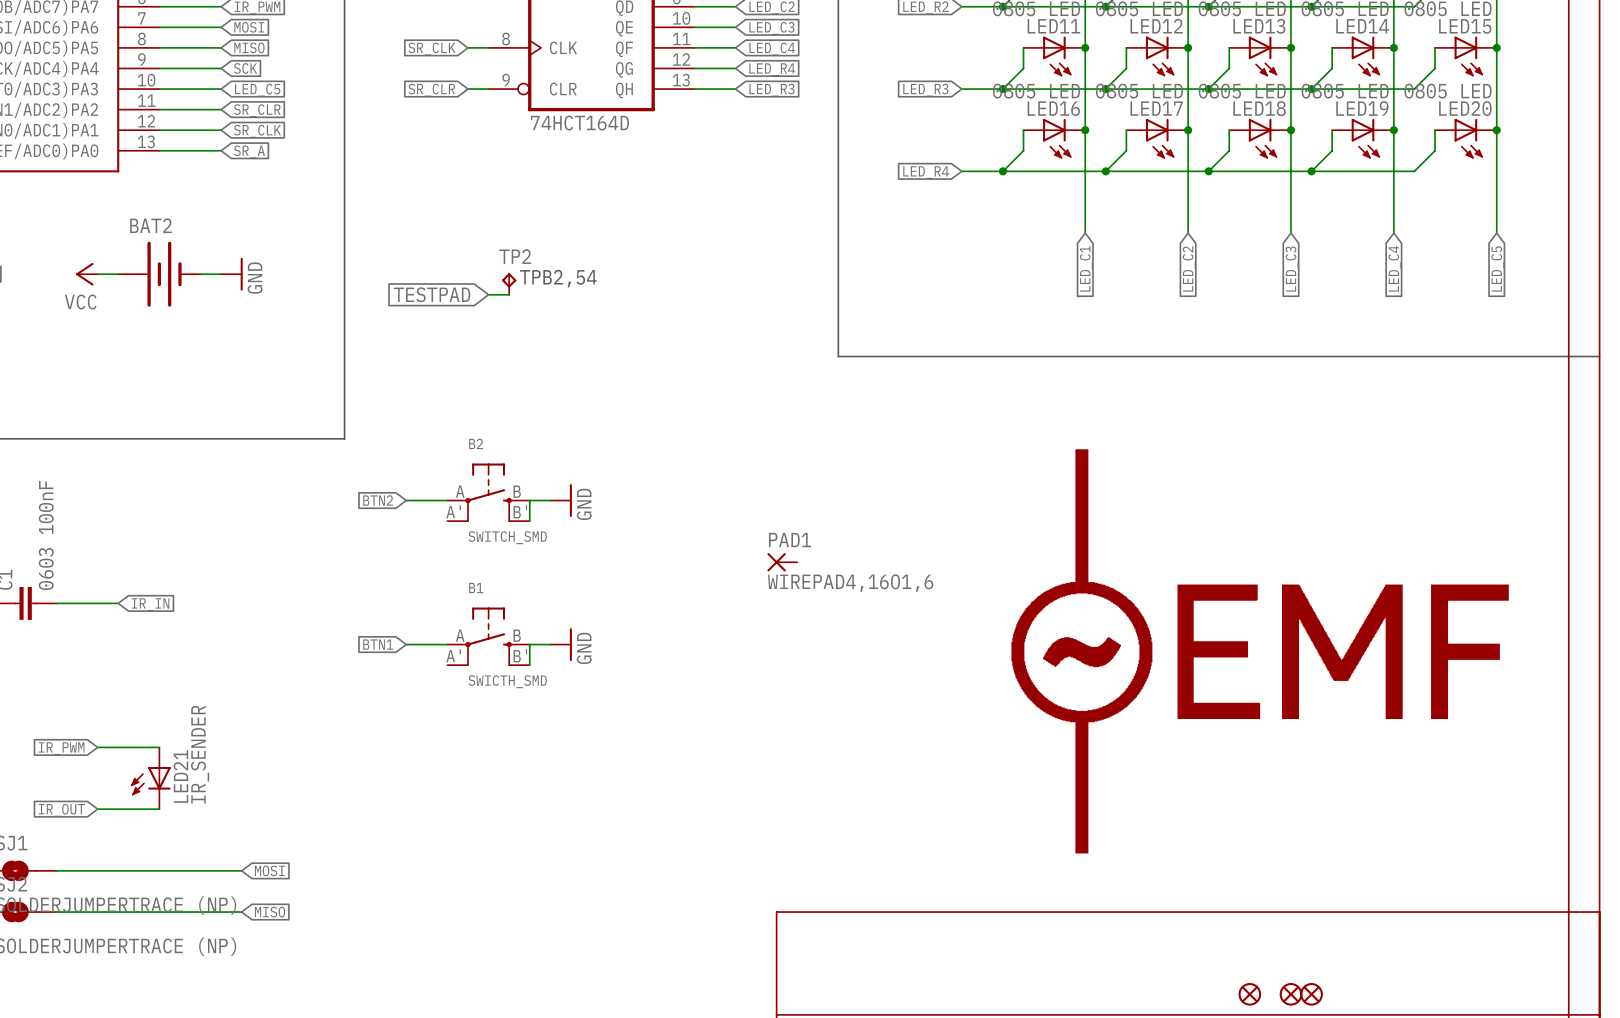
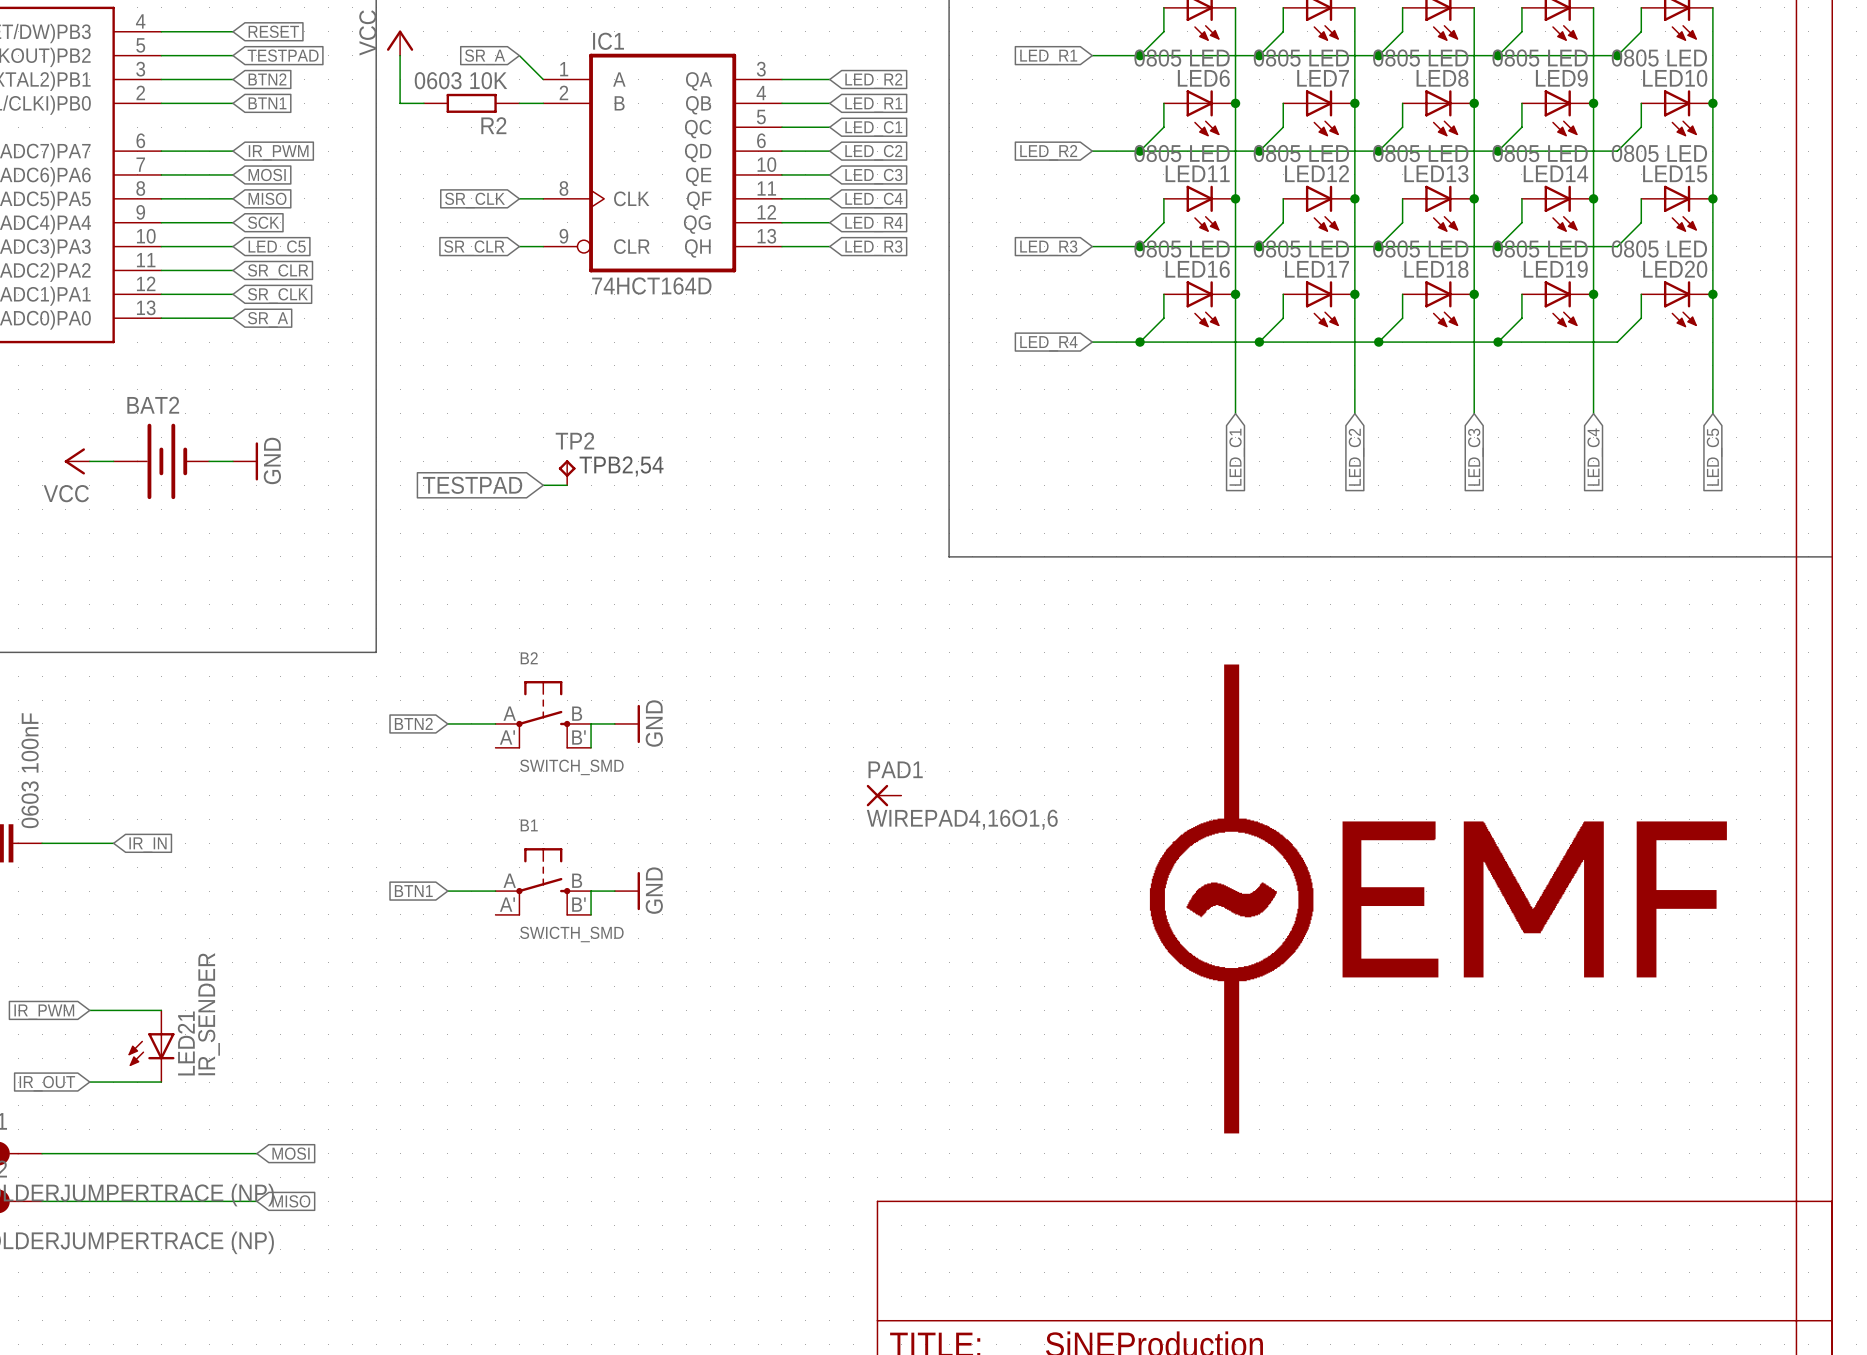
part: (1249, 994) -> none
part: (1290, 994) -> none
part: (1311, 994) -> none

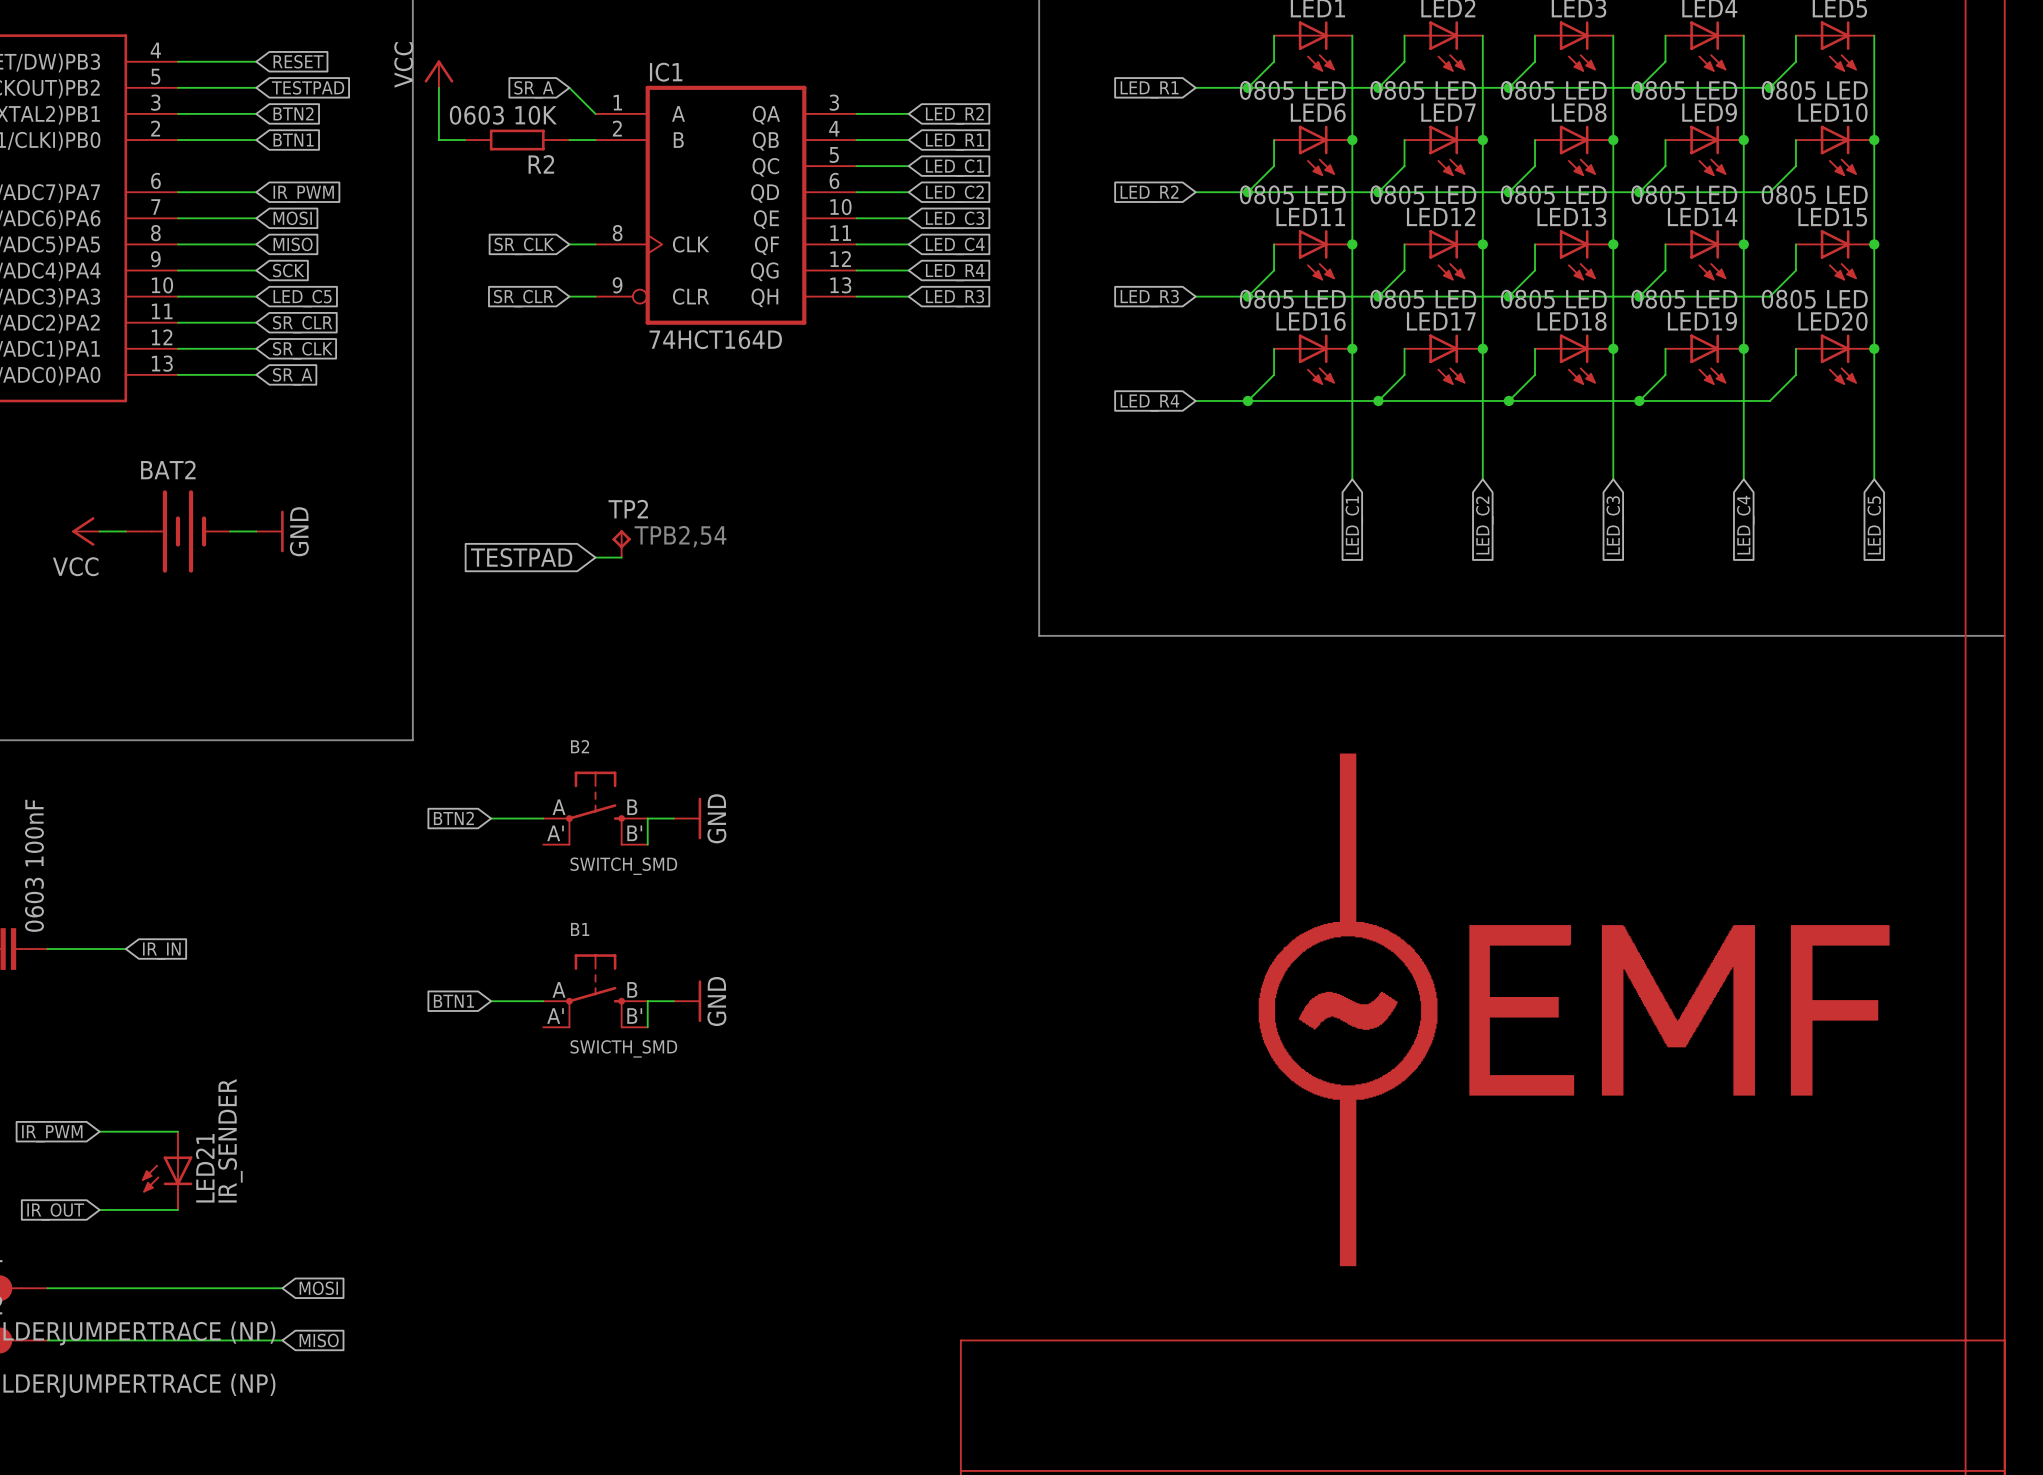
PAD1: WIREPAD4,16O1,6 (884, 795) -> none

